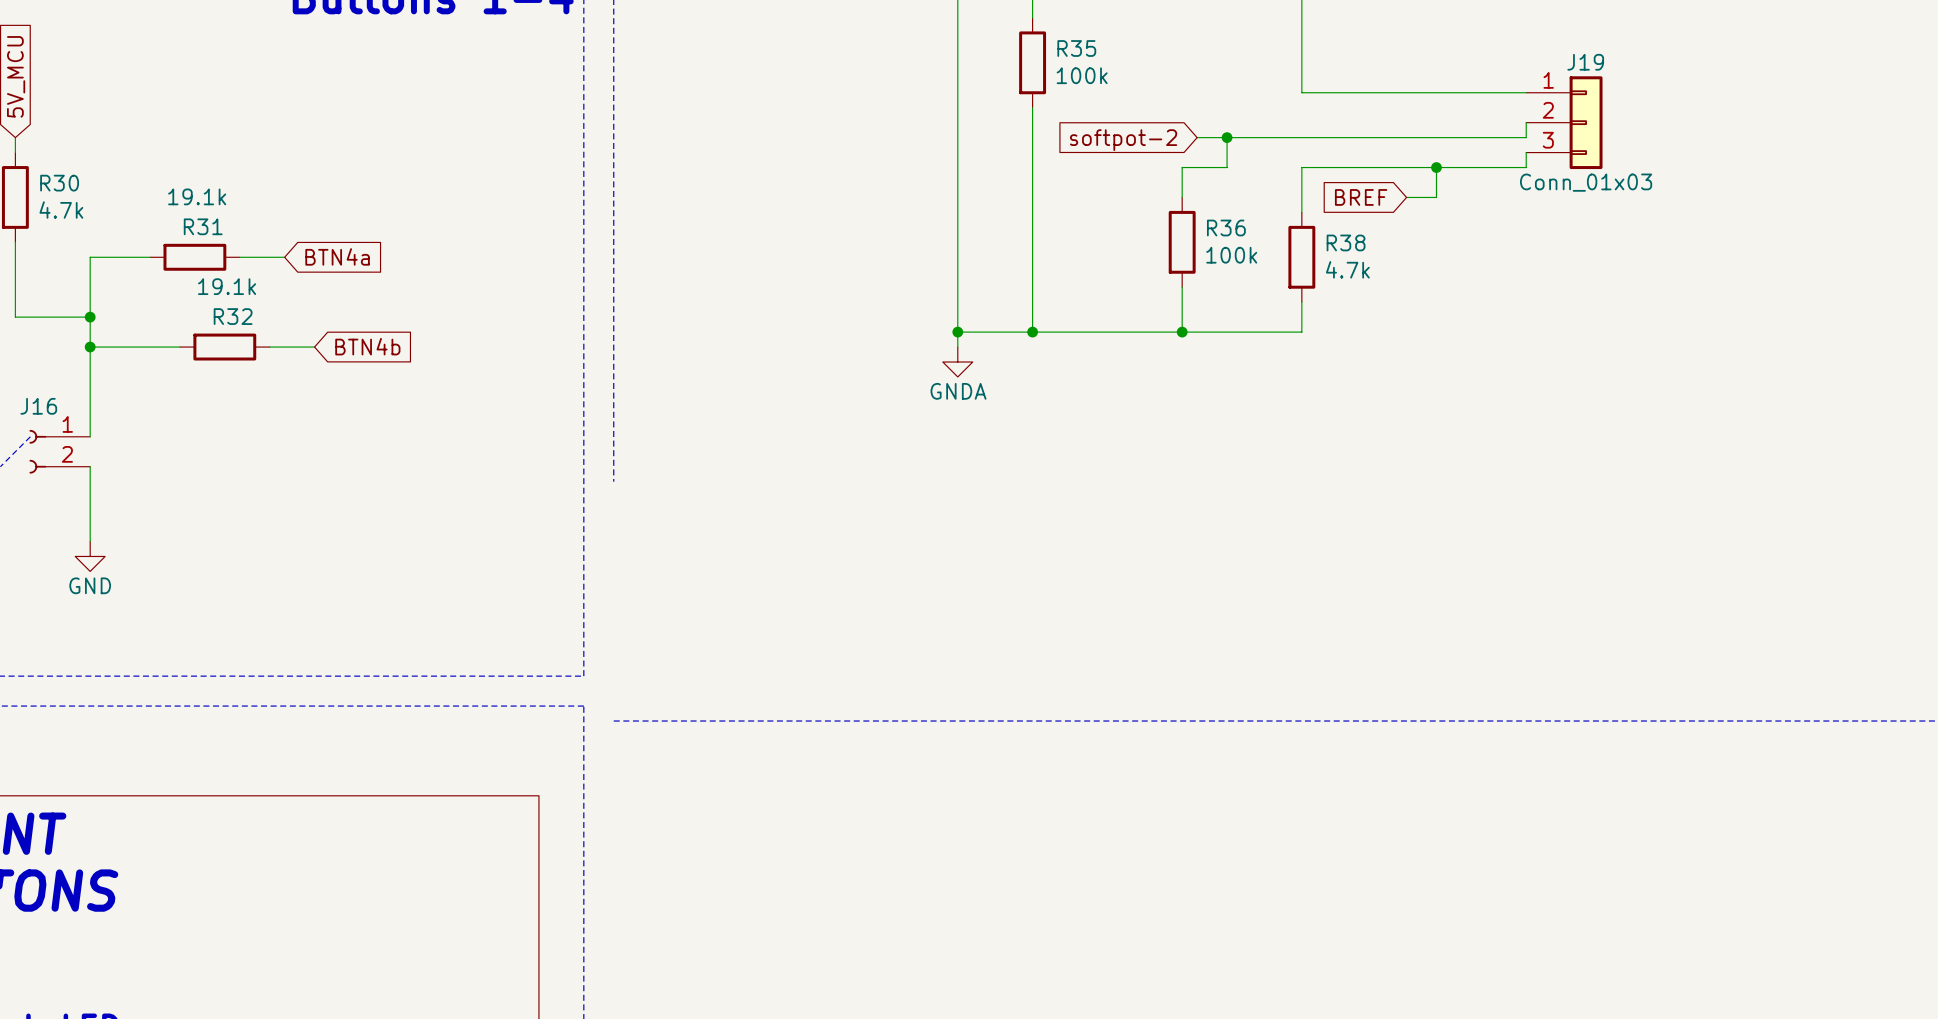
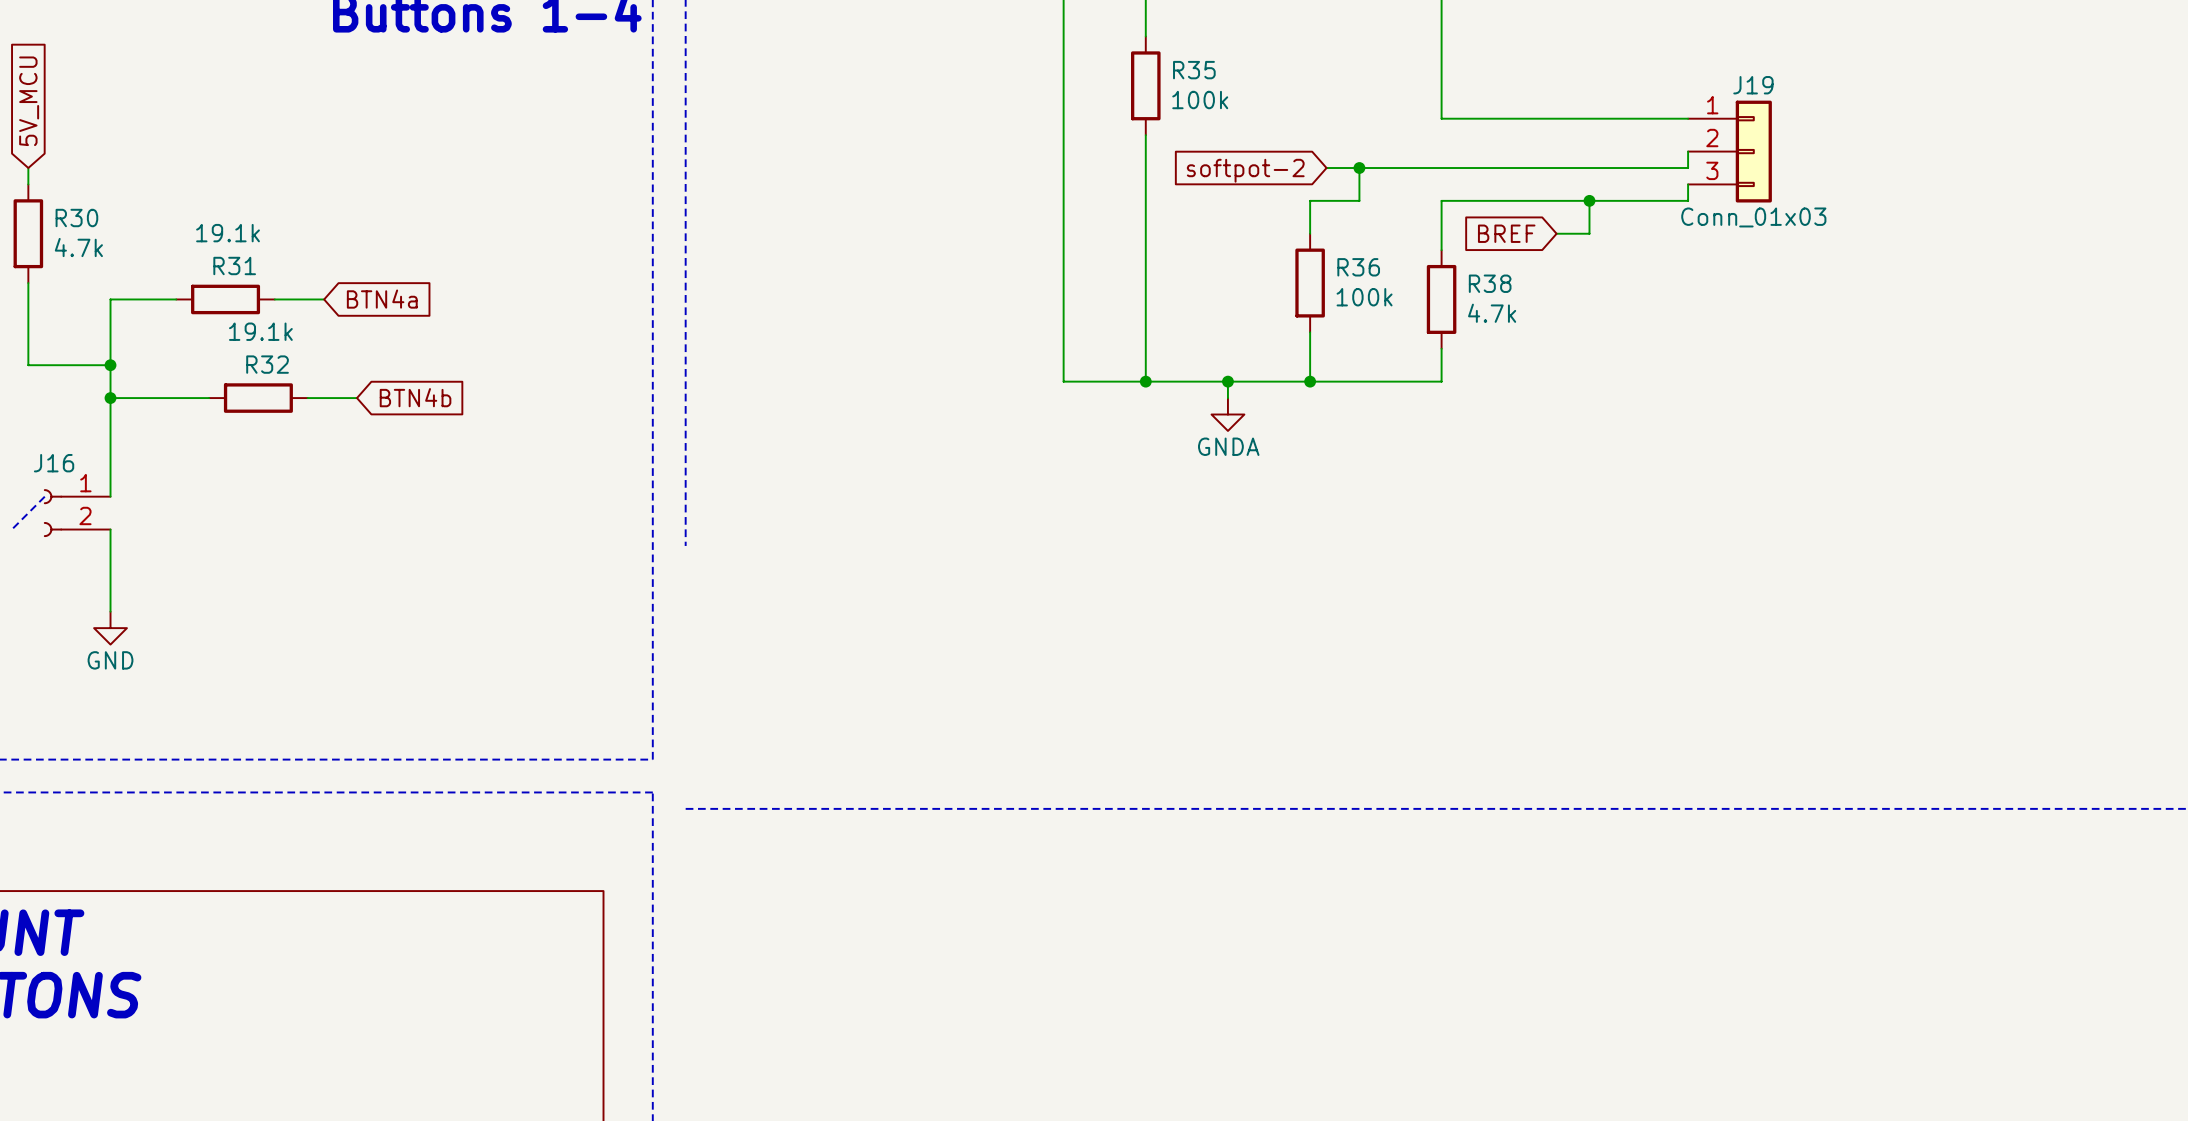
wire: (957, 332) (957, 347) -> (1227, 381) (1227, 398)
junction: (957, 332) -> none
junction: none -> (1227, 381)
power symbol position: GNDA (957, 362) -> GNDA (1227, 414)

